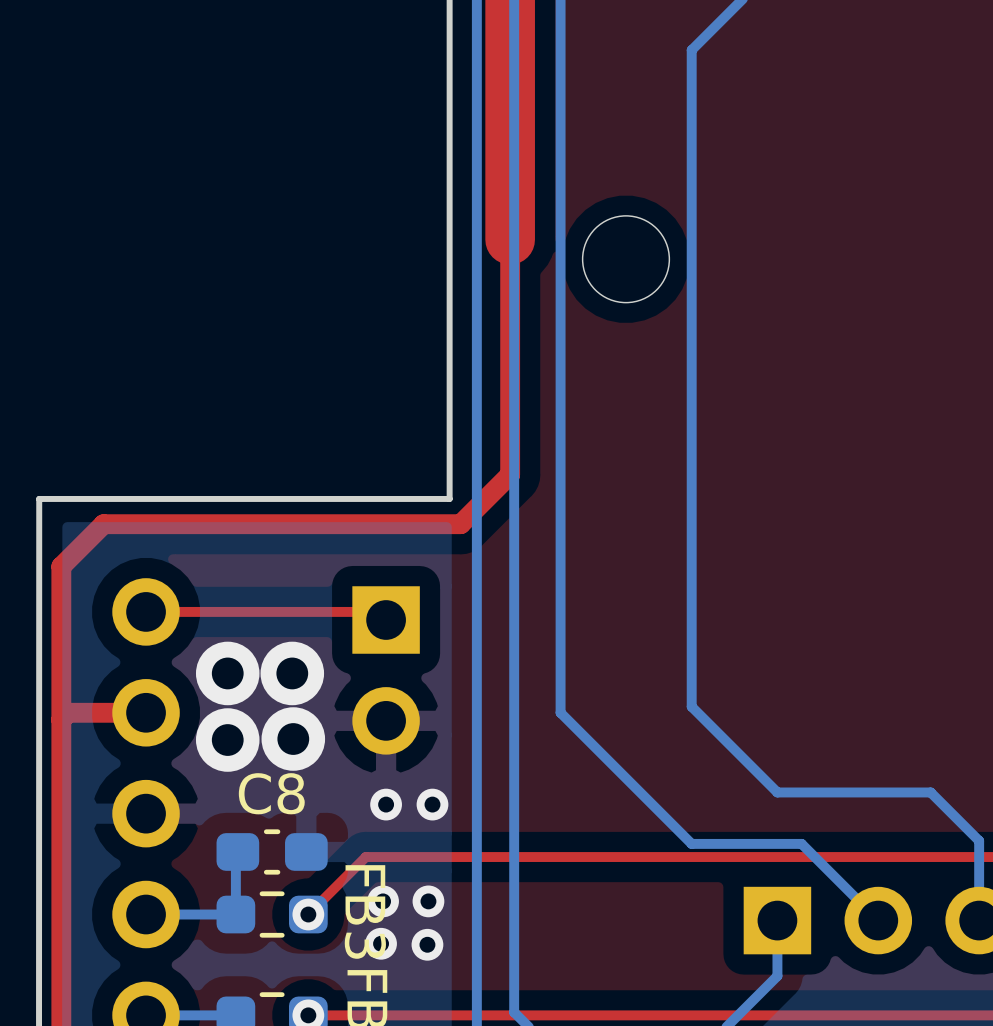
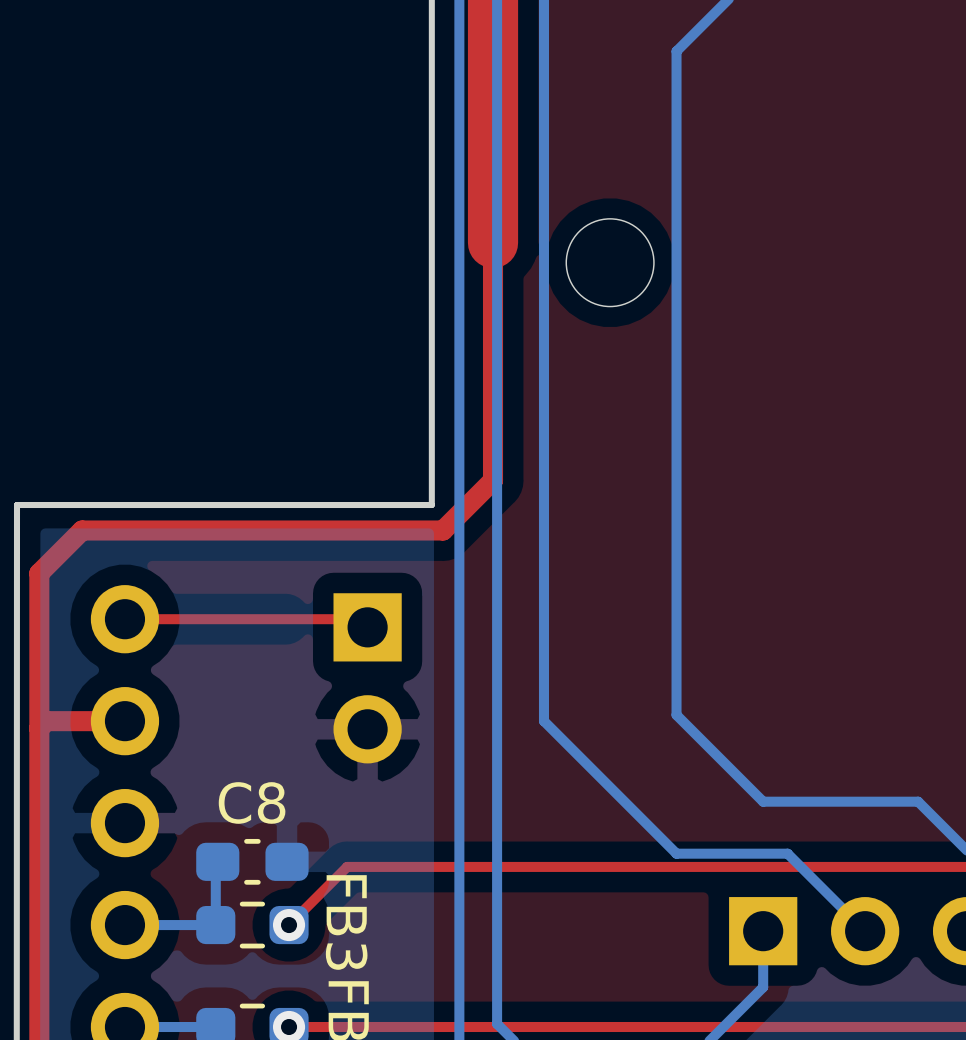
via: (227, 673) -> none
via: (292, 673) -> none
via: (293, 739) -> none
via: (227, 740) -> none
via: (386, 804) -> none
via: (432, 804) -> none
via: (383, 901) -> none
via: (428, 901) -> none
via: (381, 943) -> none
via: (427, 944) -> none

